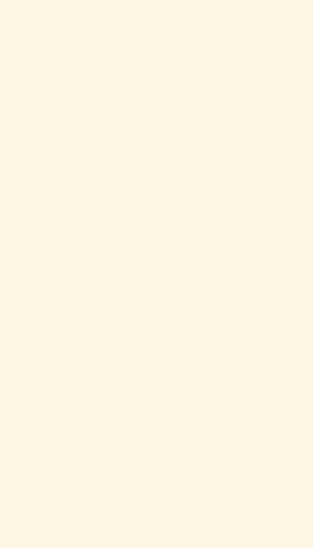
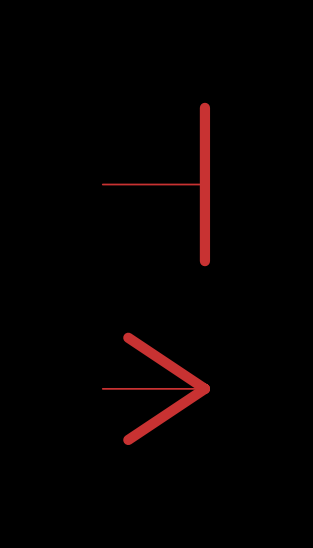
power symbol: none -> (156, 184)
power symbol: none -> (156, 388)

